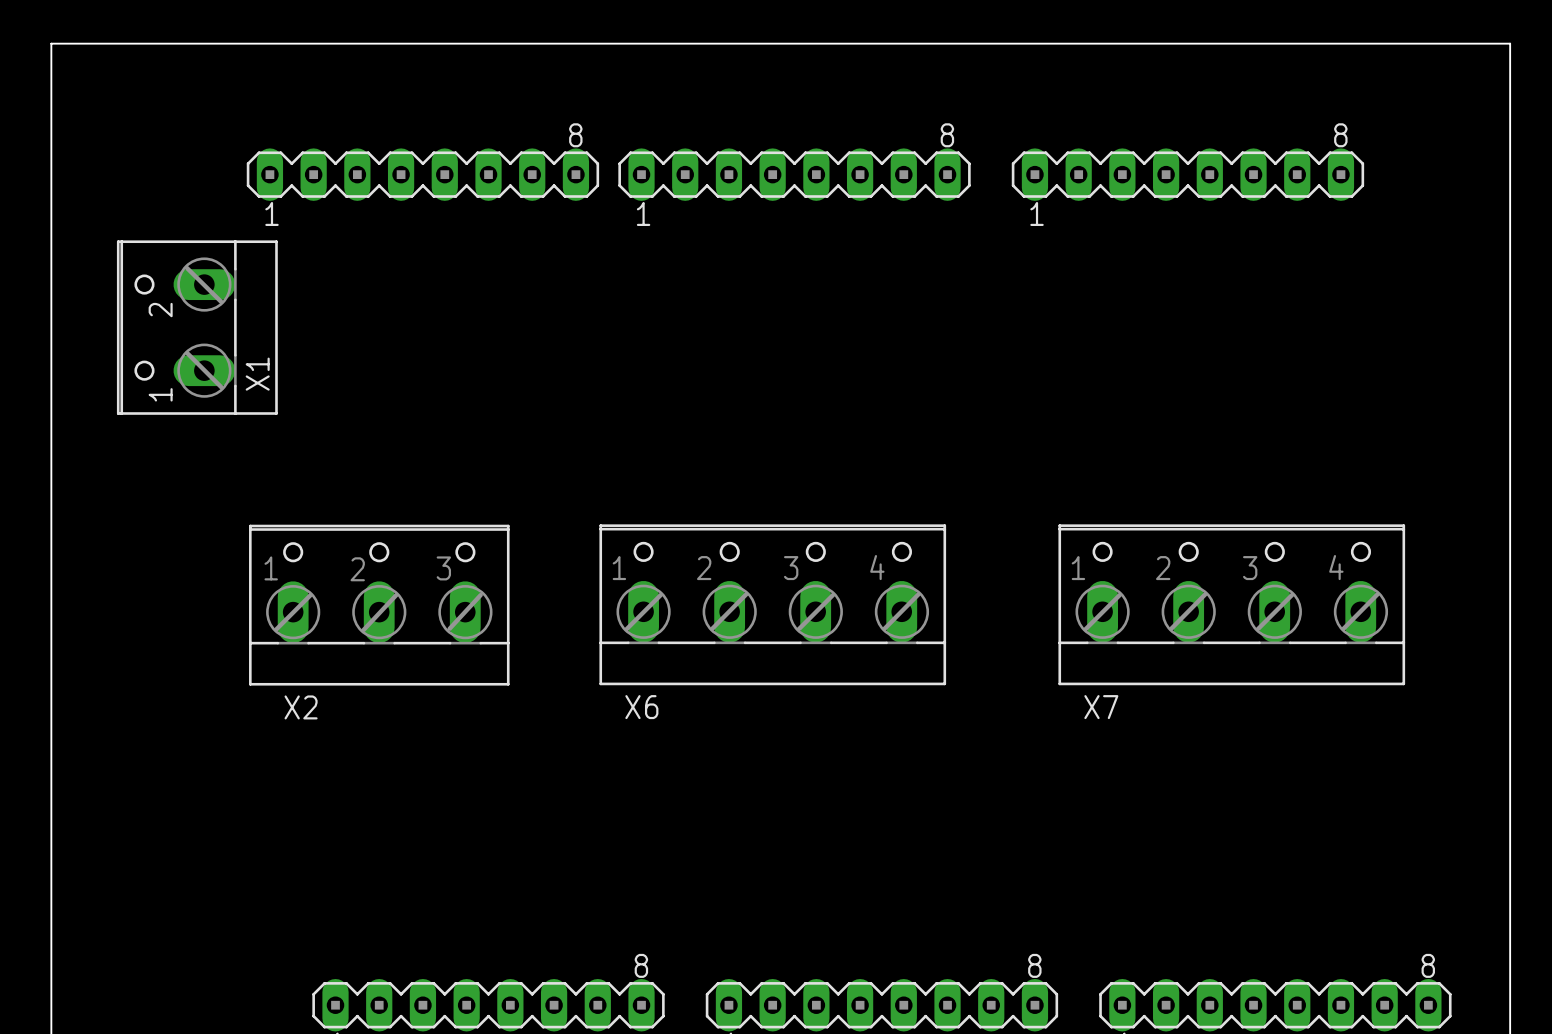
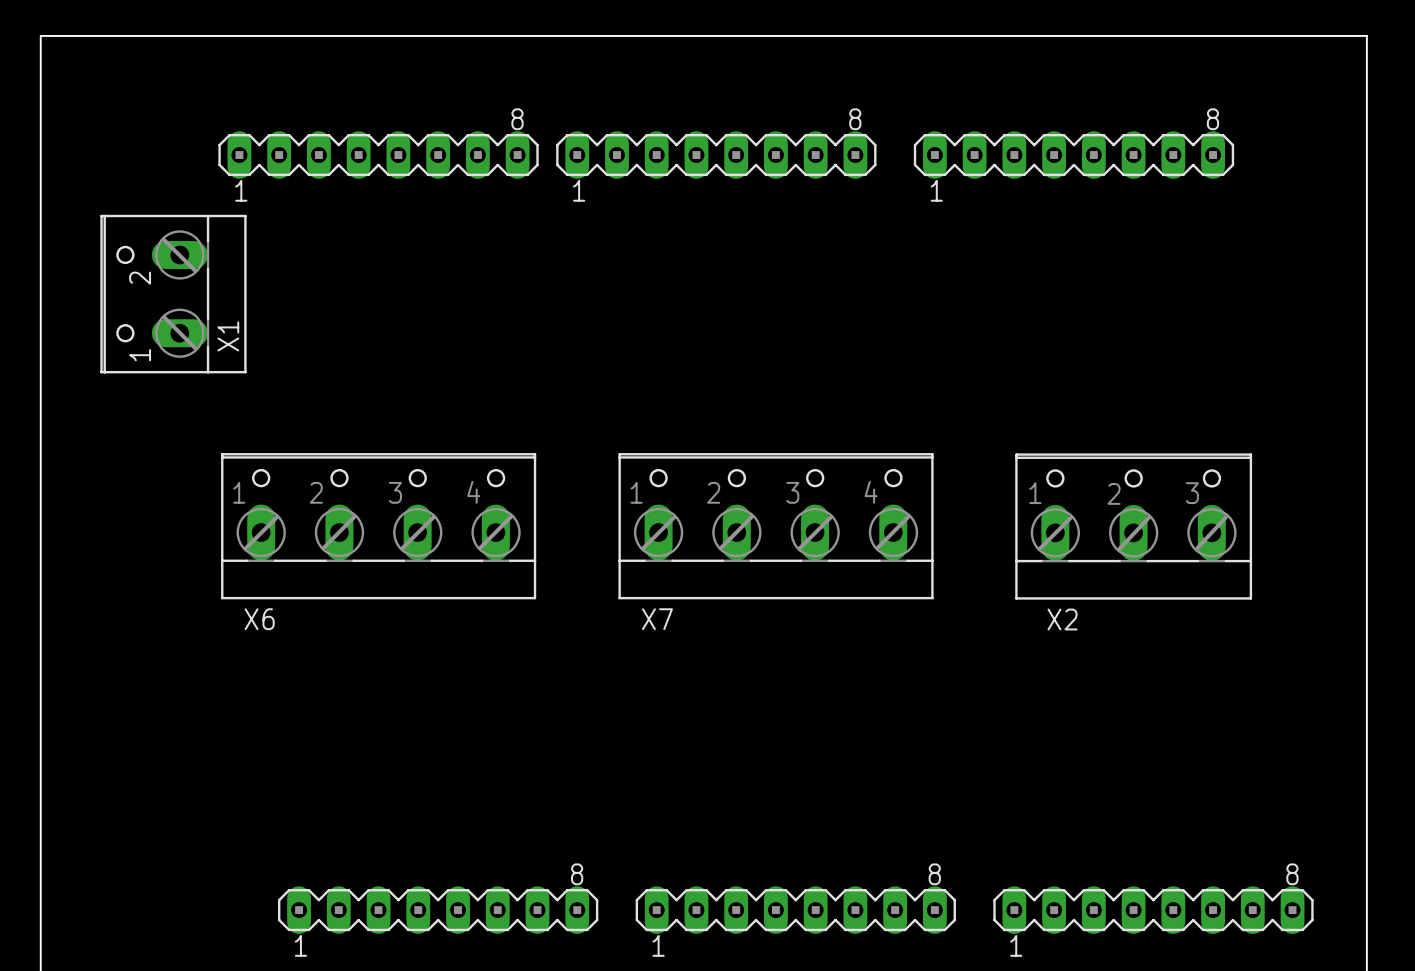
X6 position: (772, 604) -> (378, 526)
X7 position: (1231, 604) -> (776, 526)
X2 position: (379, 605) -> (1133, 526)

